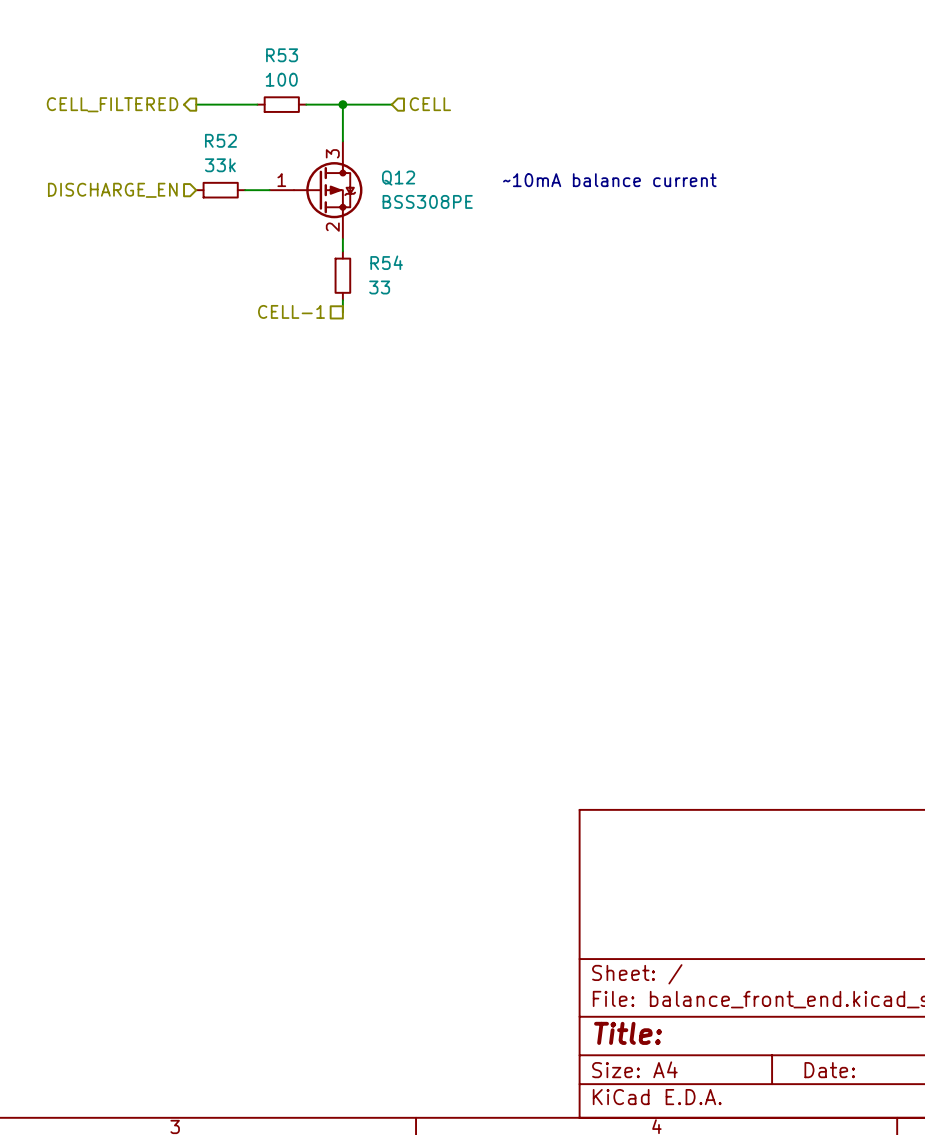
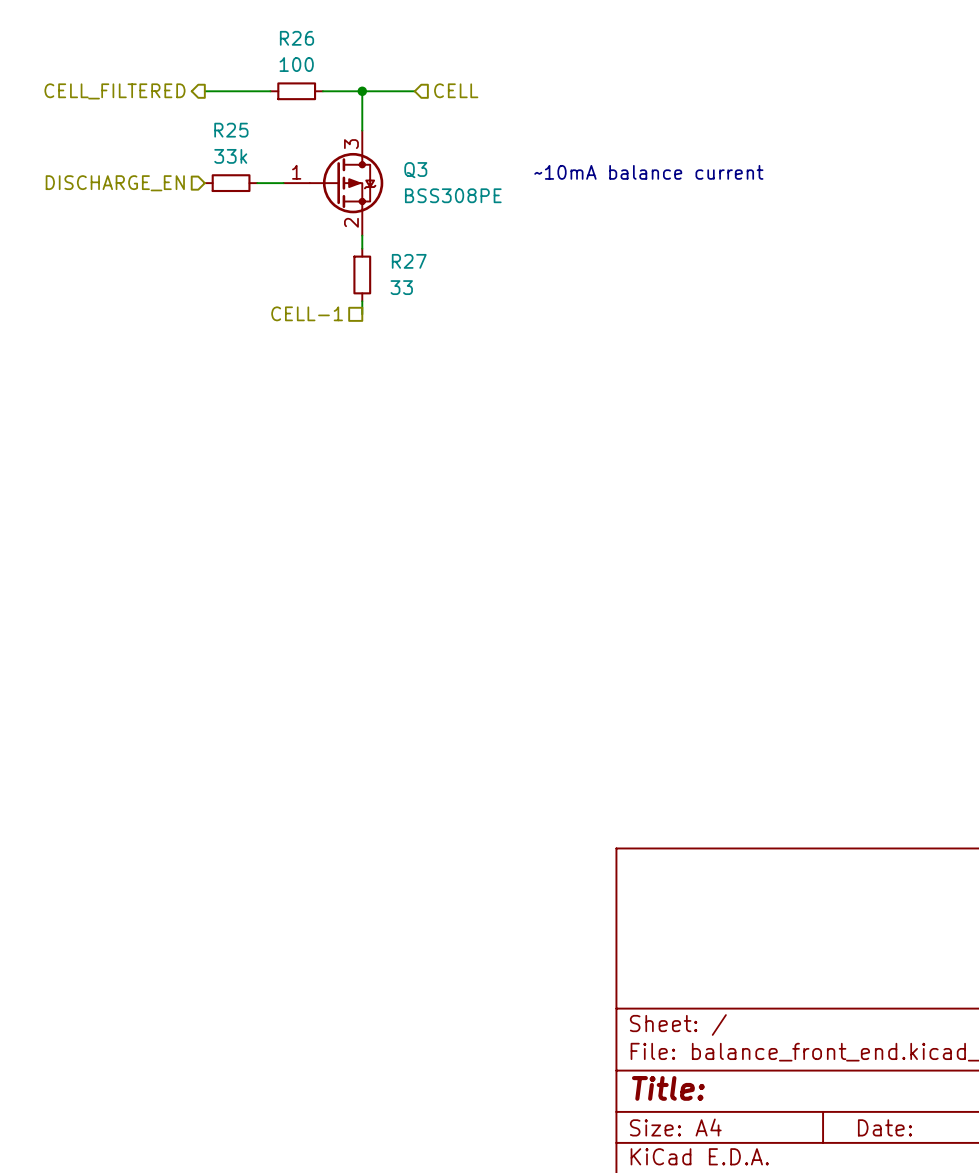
R53 name: R53 (282, 55) -> R26 (296, 38)
R52 name: R52 (220, 140) -> R25 (231, 130)
Q12 name: Q12 (398, 178) -> Q3 (415, 170)
R54 name: R54 (386, 262) -> R27 (409, 261)

